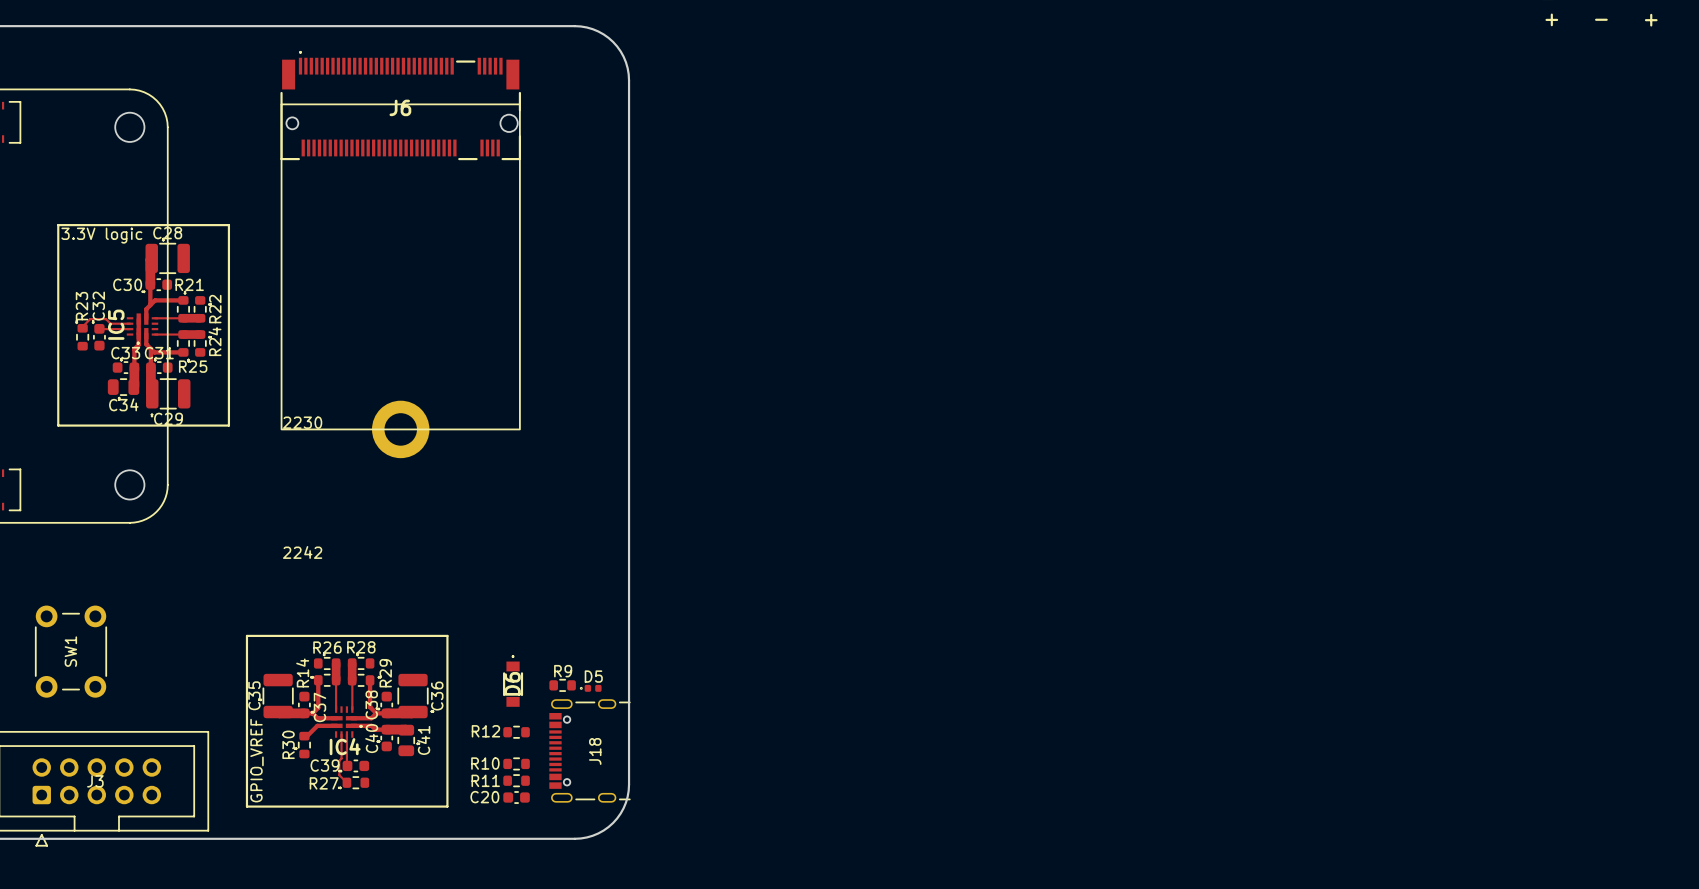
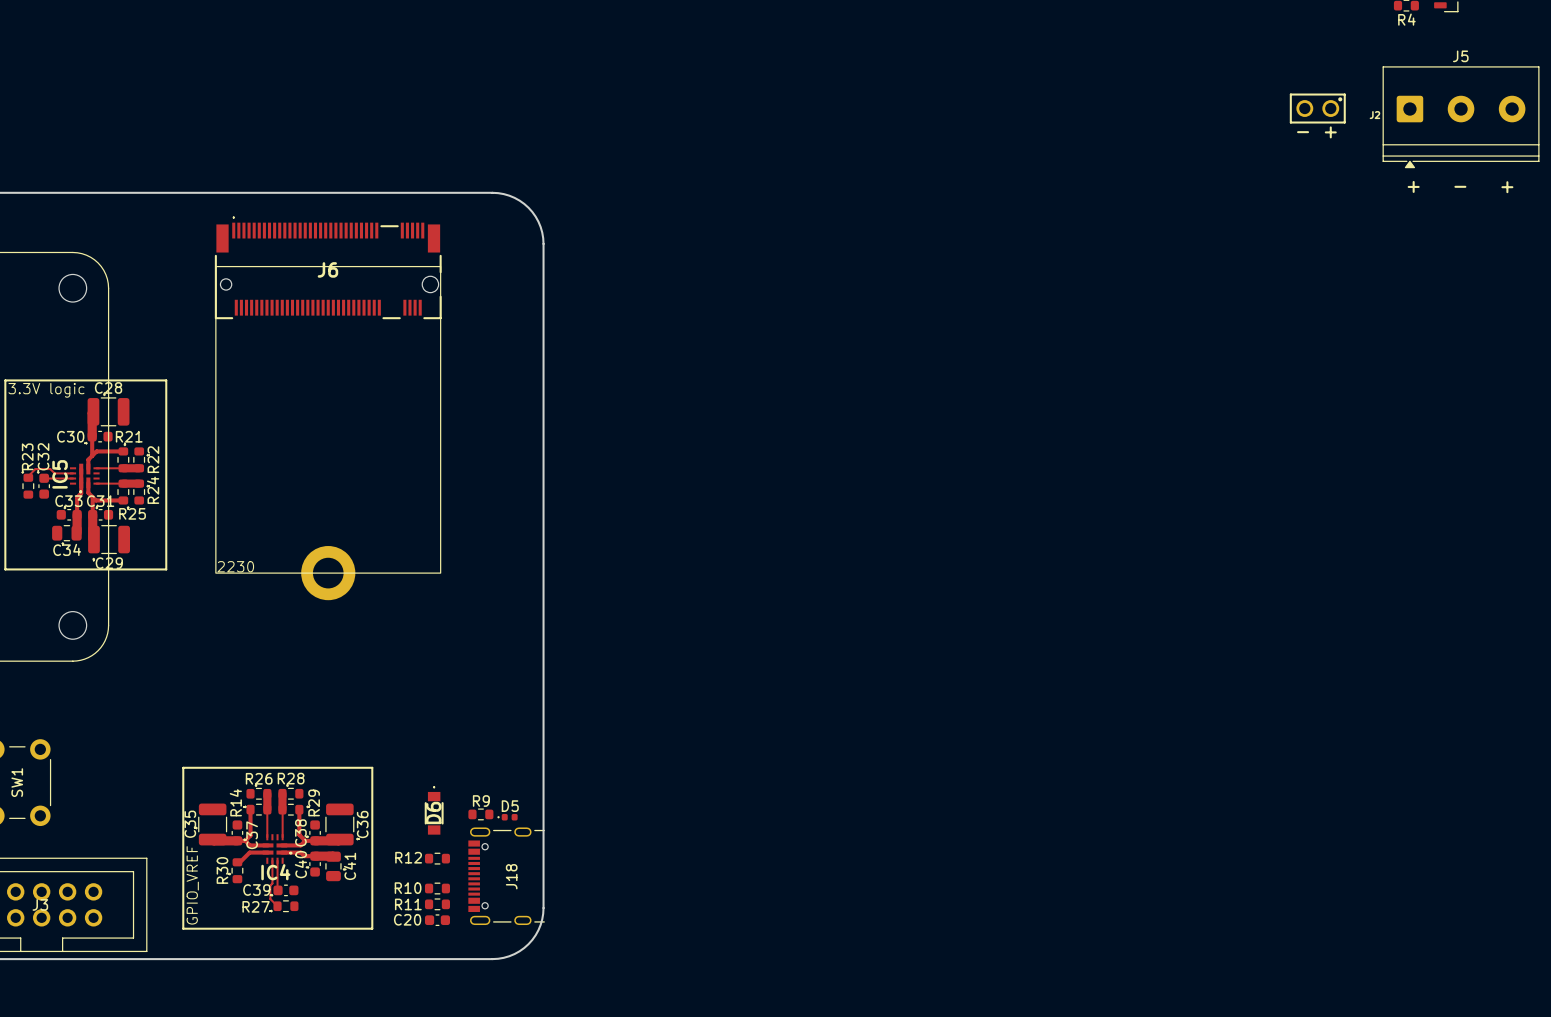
J6 text: 2242 (302, 552) -> none

